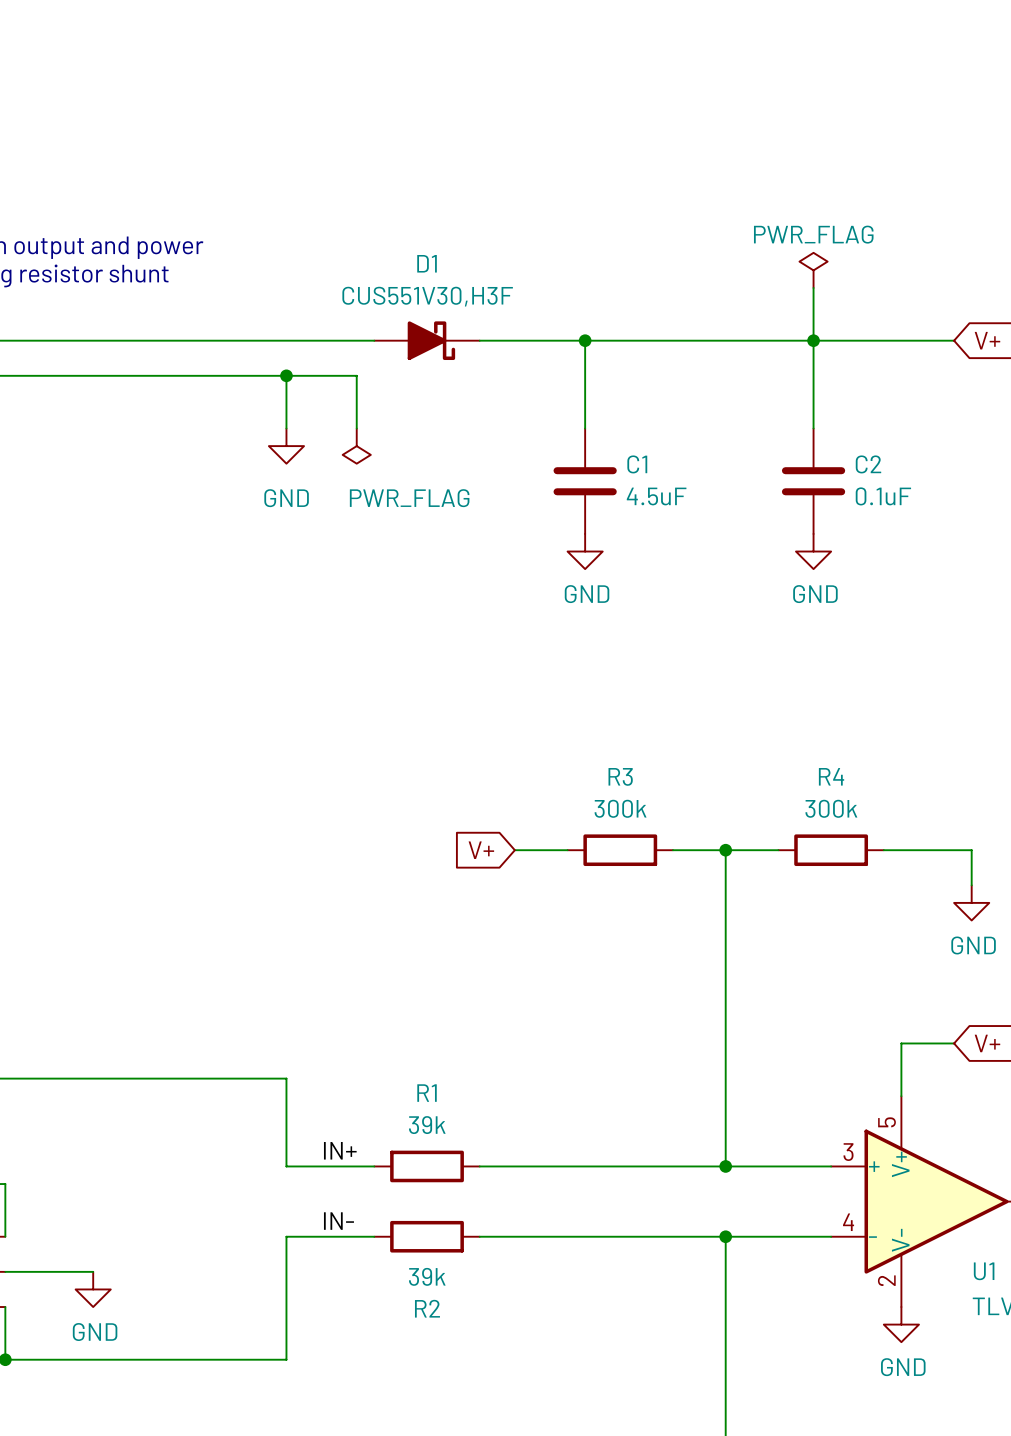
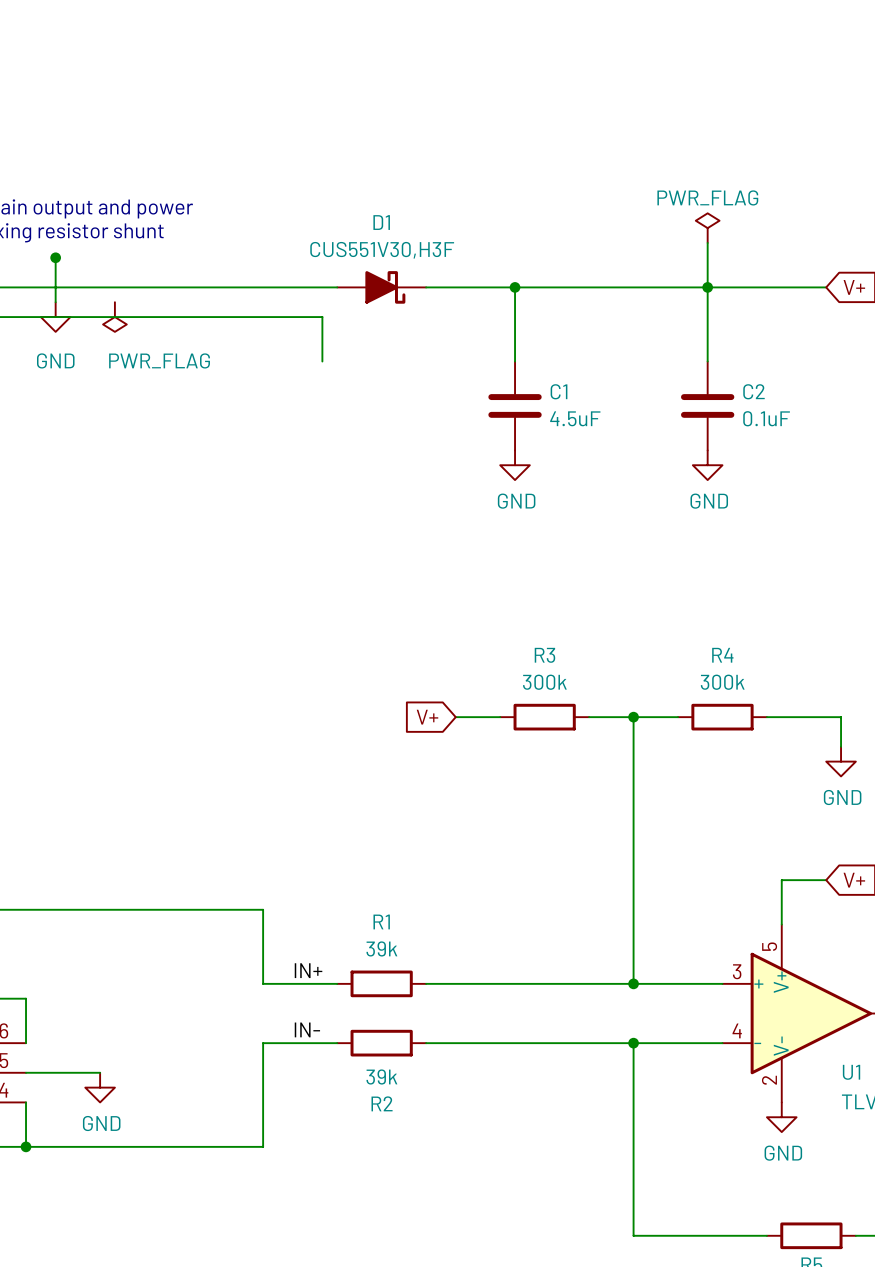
junction: none -> (55, 257)
wire: (286, 375) (286, 428) -> (55, 257) (55, 302)
junction: (286, 375) -> none
power symbol position: GND (286, 446) -> GND (55, 317)
power symbol position: PWR_FLAG (356, 446) -> PWR_FLAG (114, 317)

